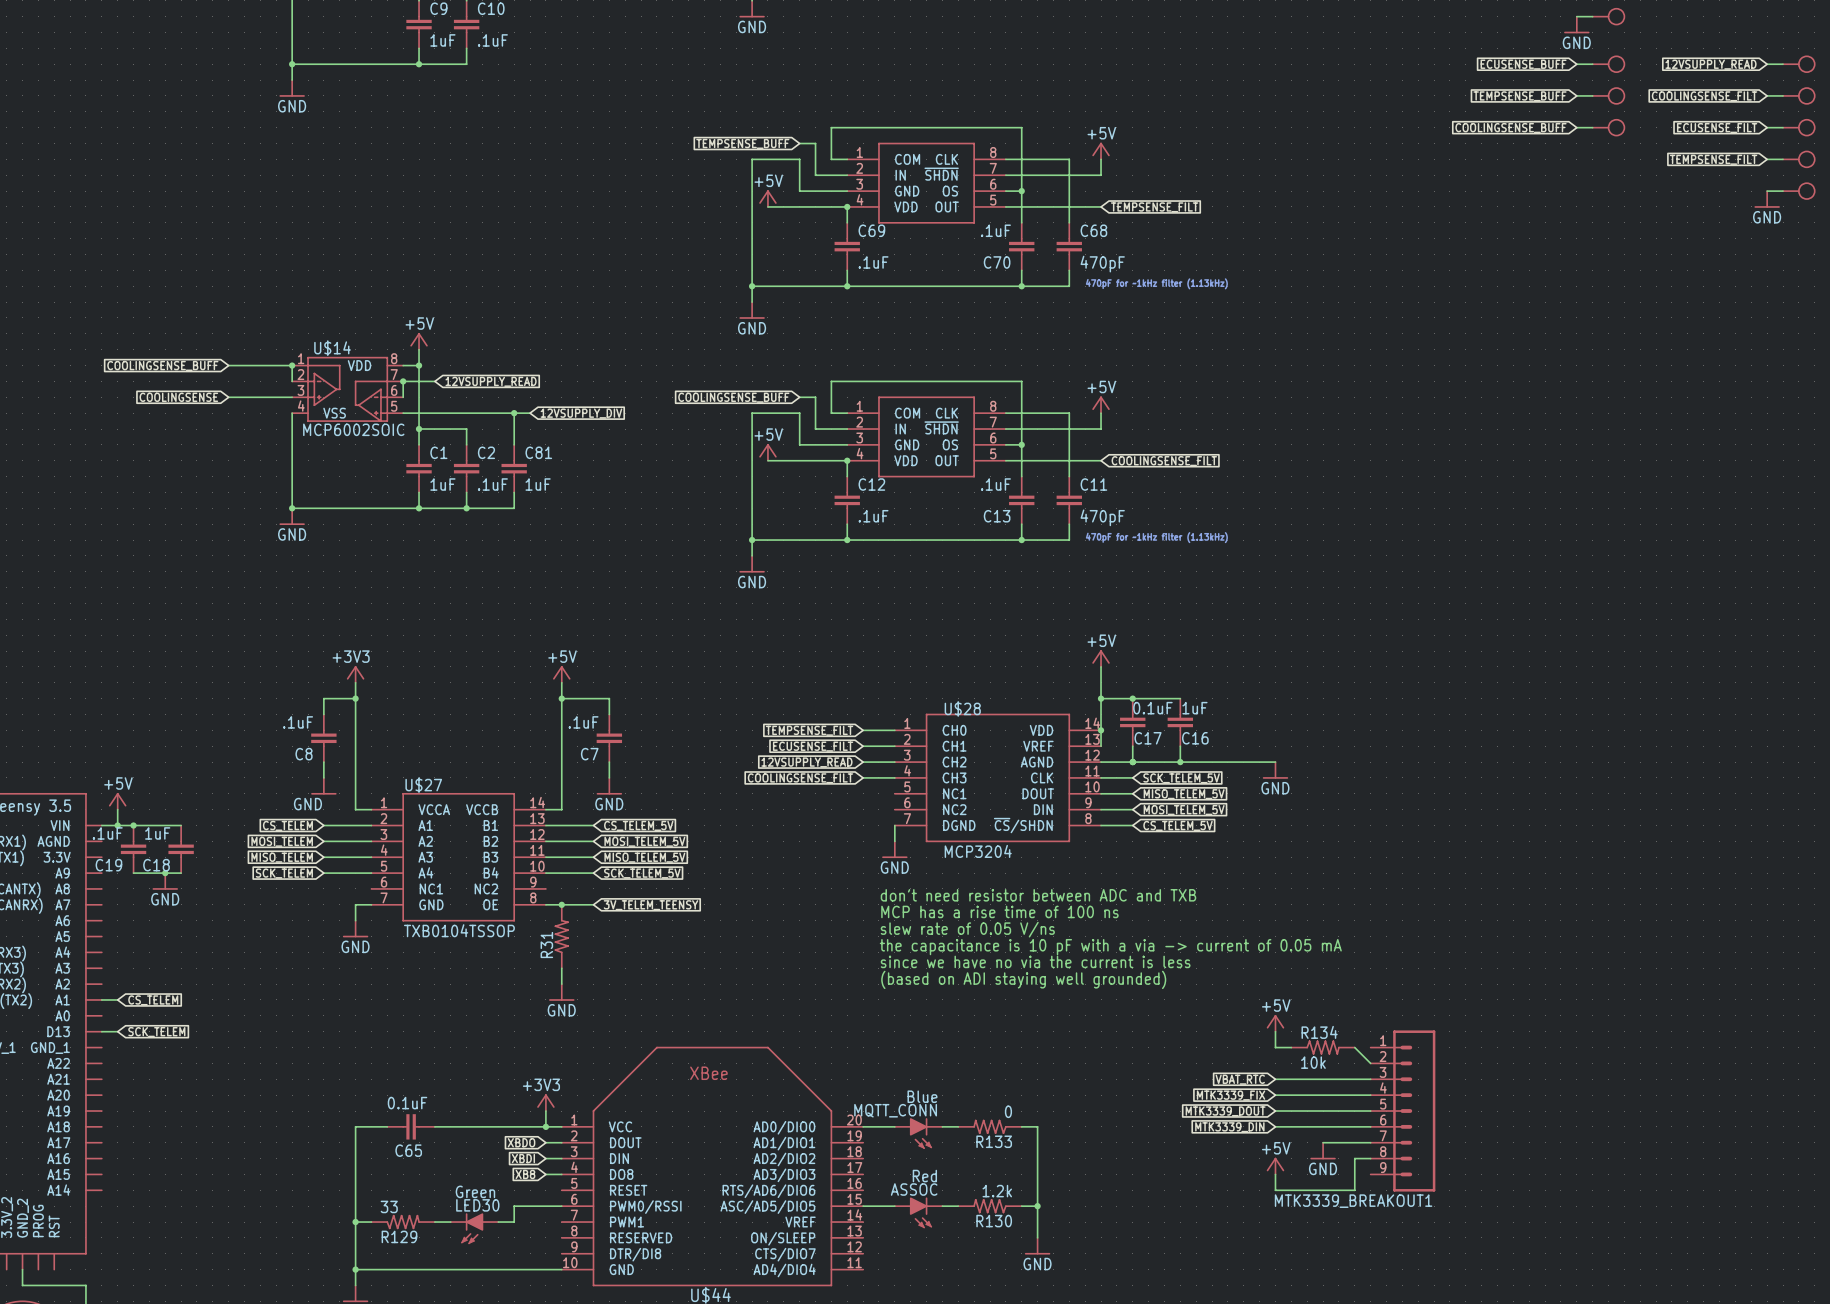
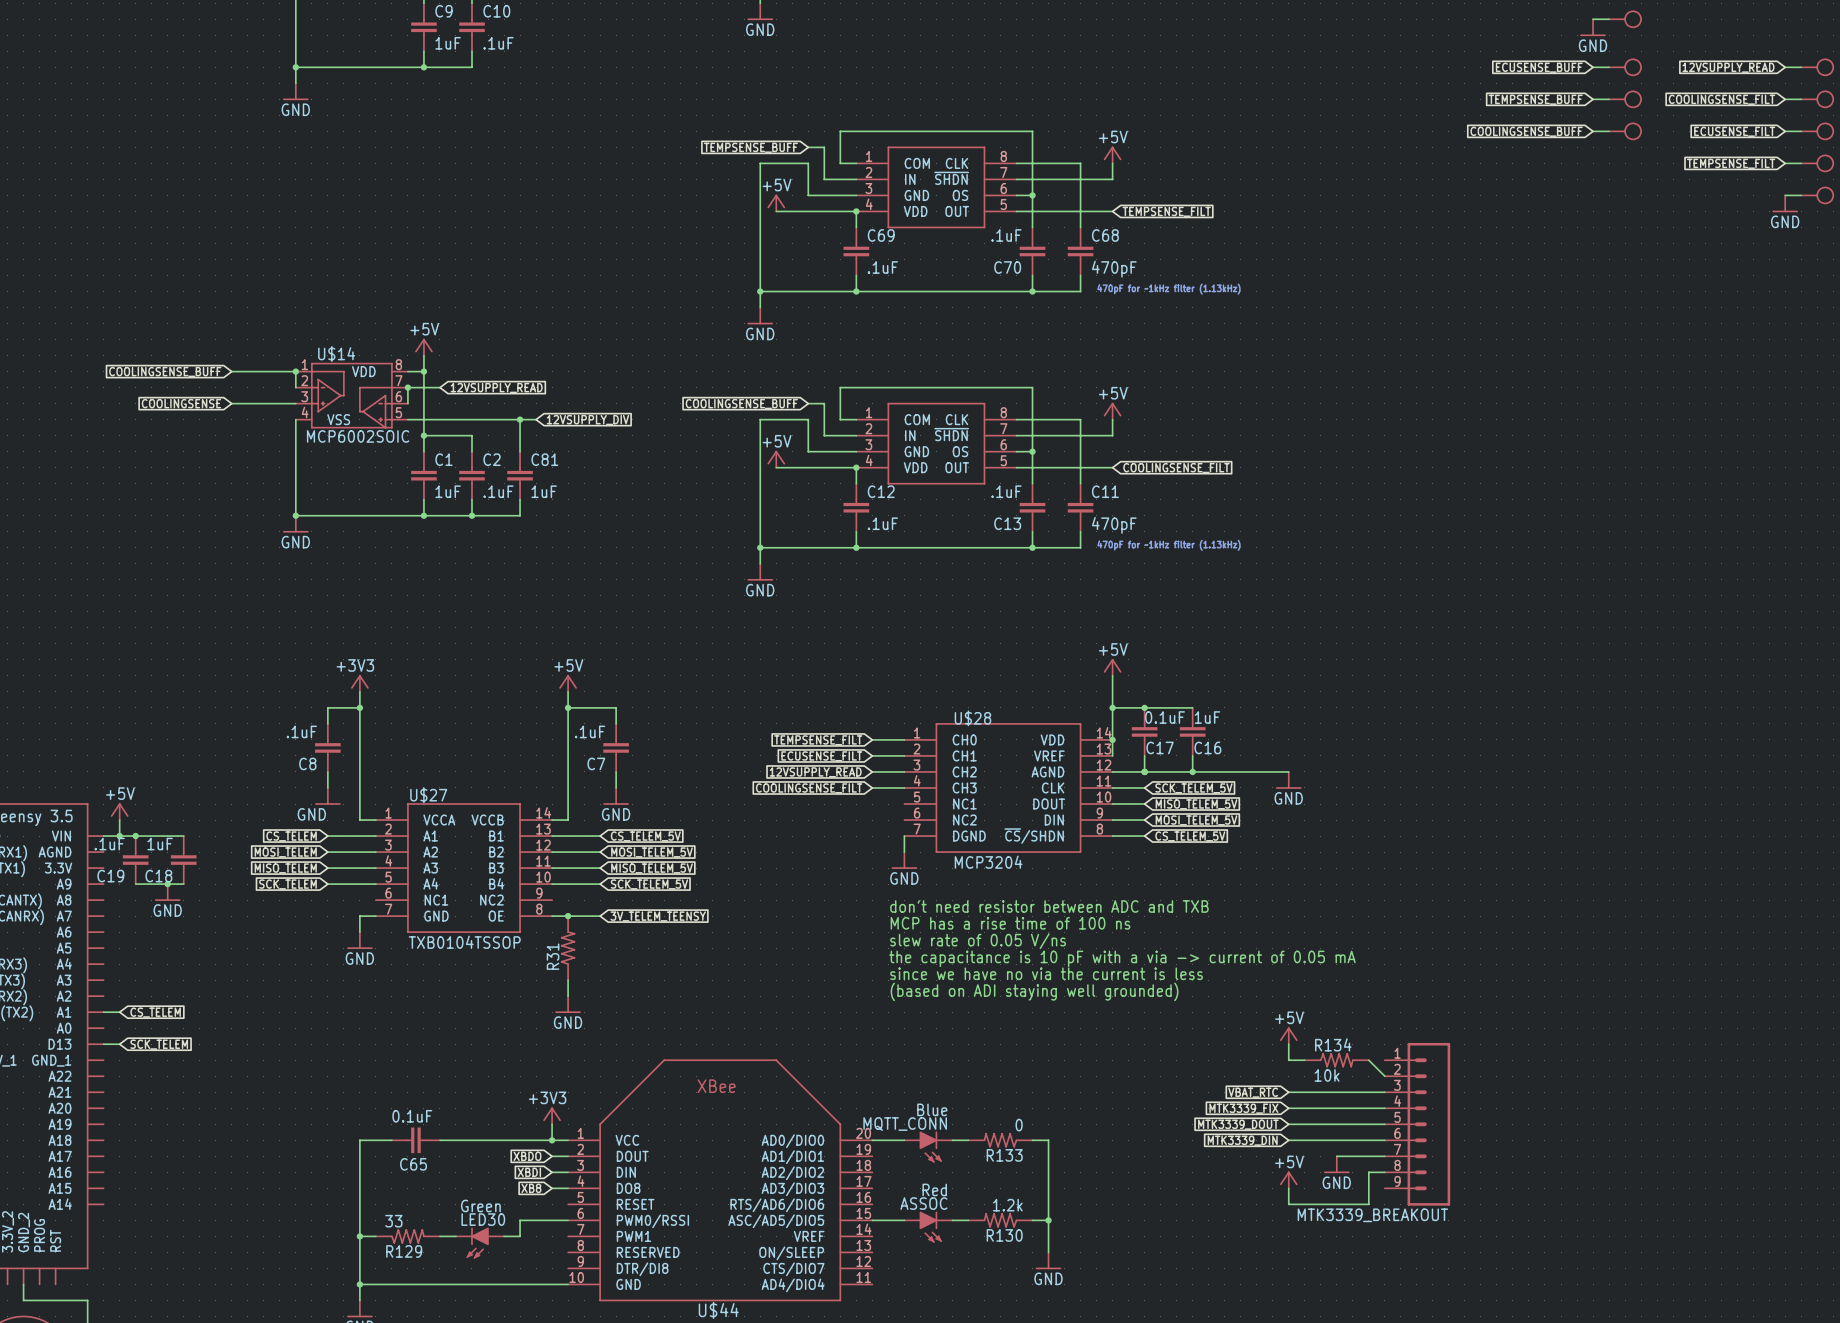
MTK3339_BREAKOUT1 name: MTK3339_BREAKOUT1 (1353, 1201) -> MTK3339_BREAKOUT (1372, 1215)

